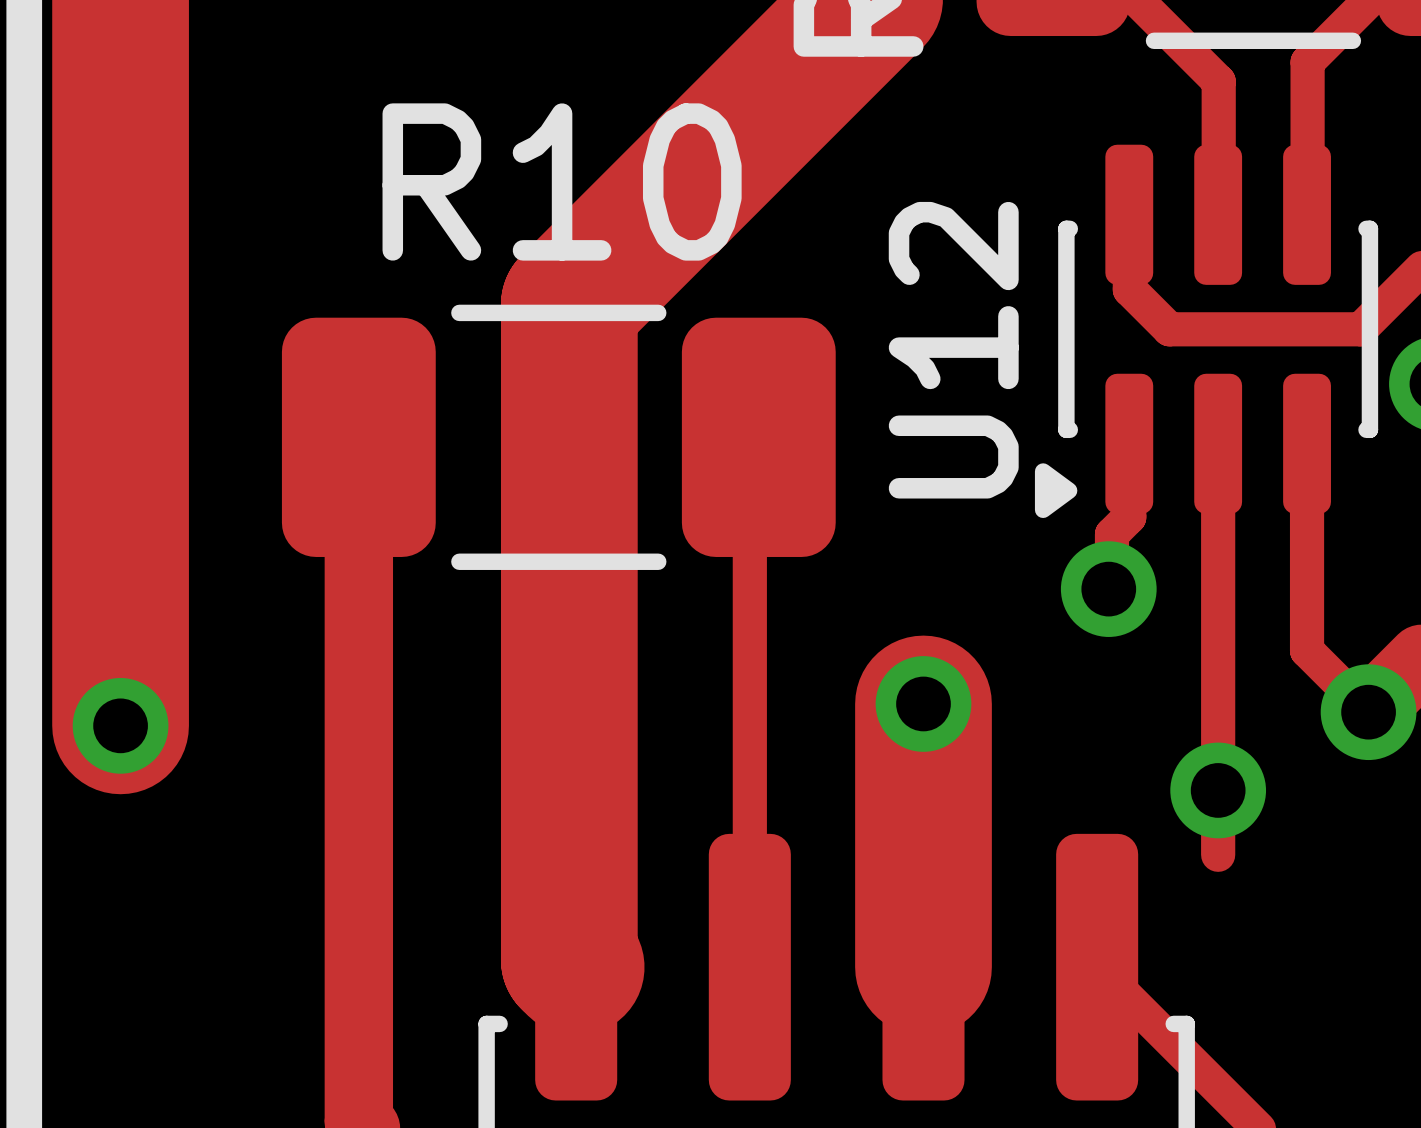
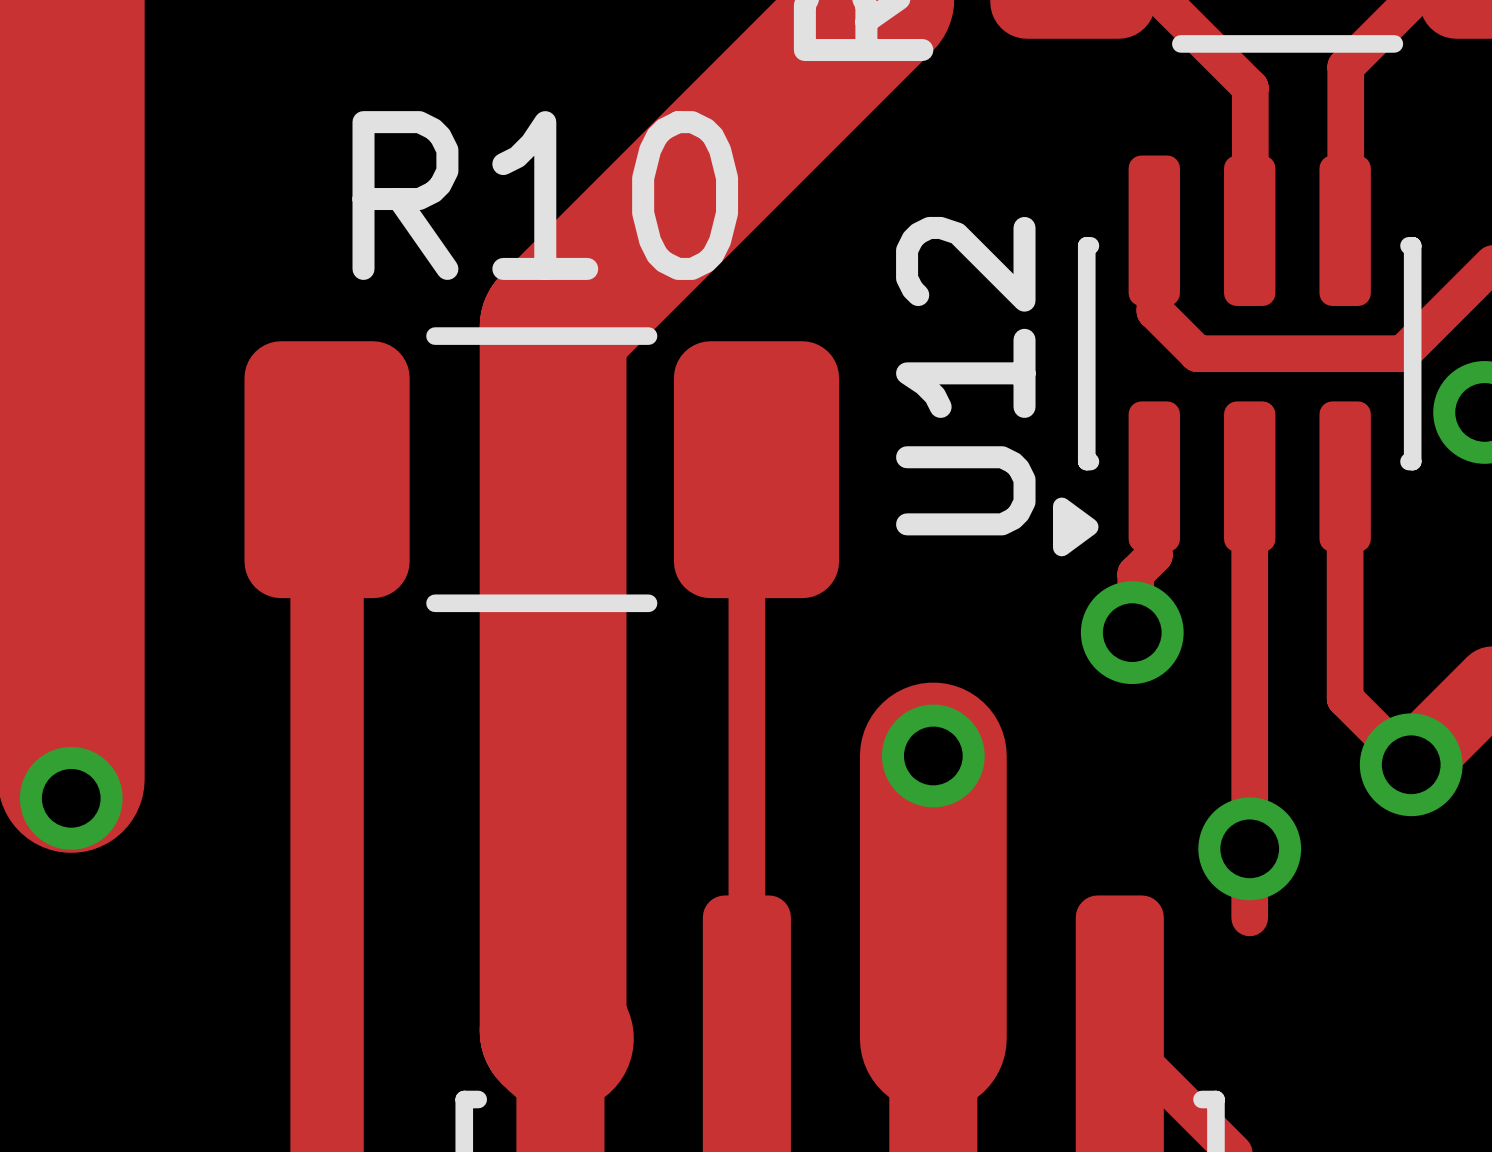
via position: (120, 725) -> (71, 798)

